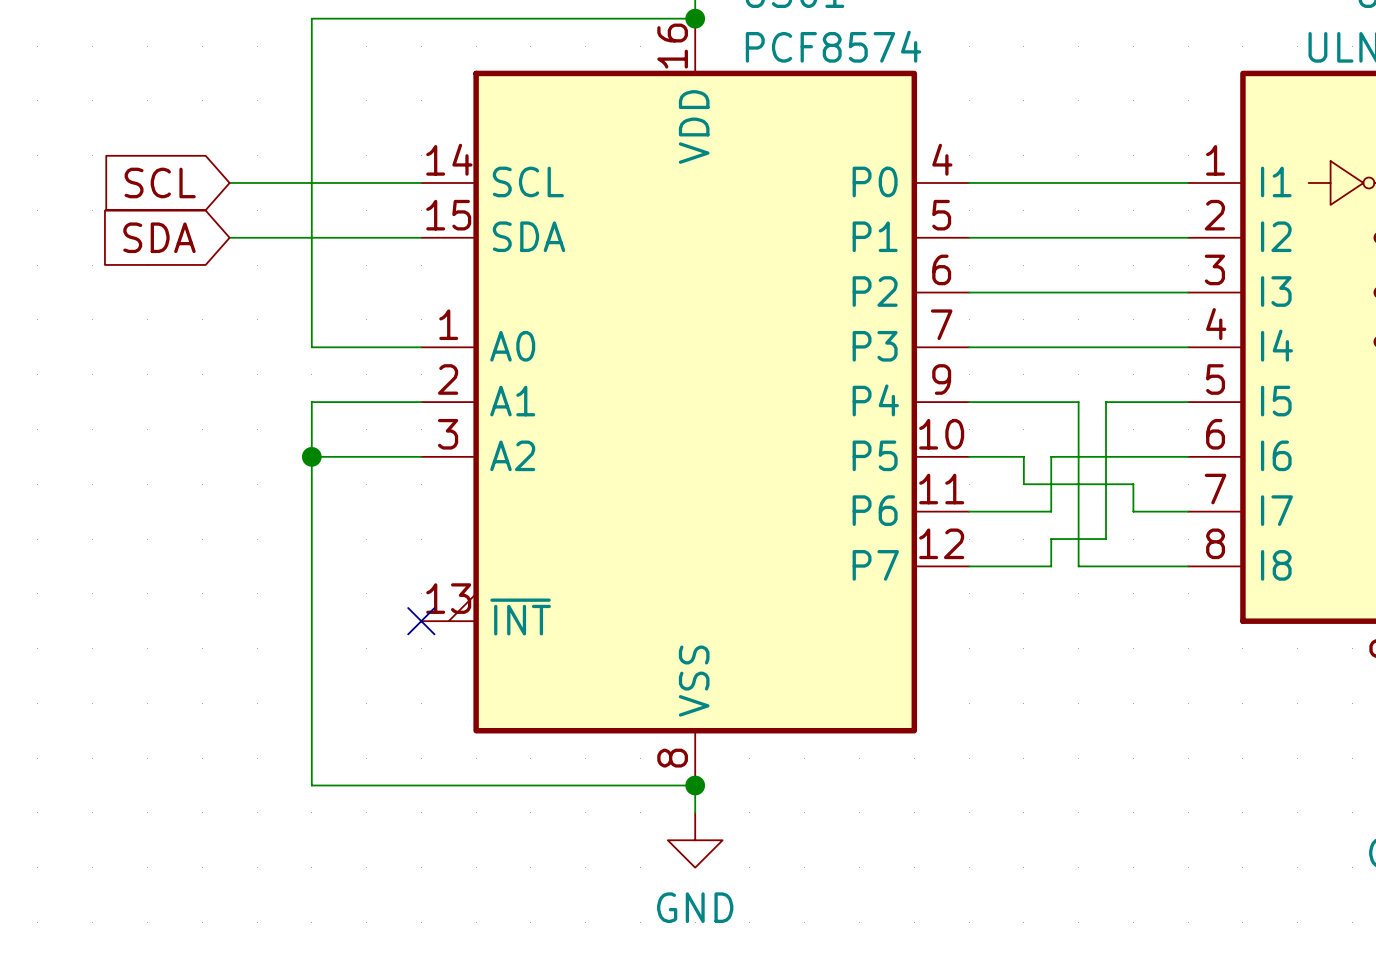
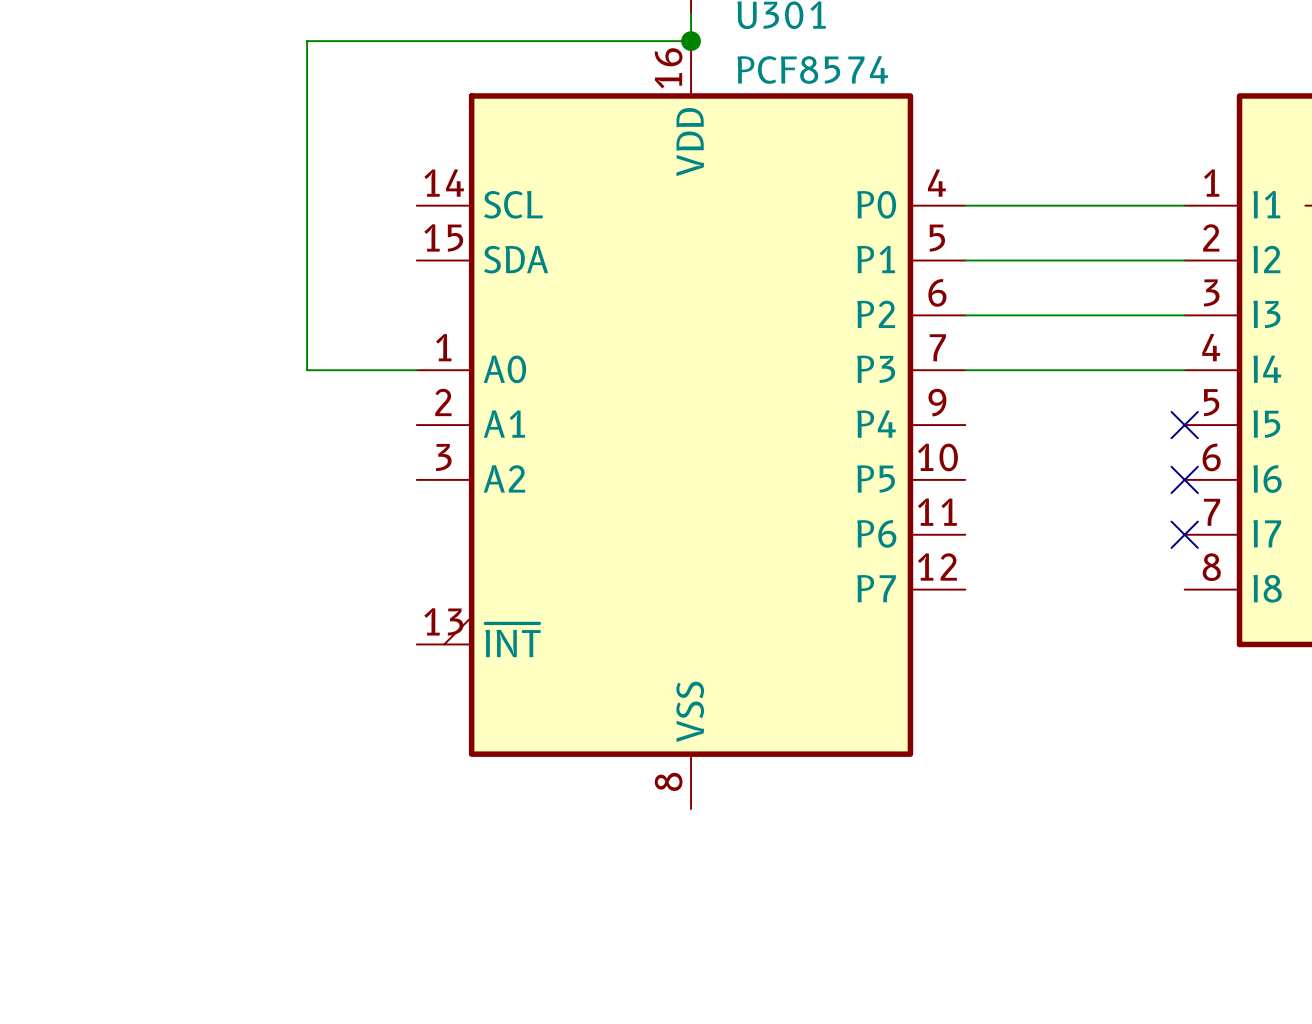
global label: SCL (160, 182) -> none
wire: (229, 182) (421, 182) -> none
global label: SDA (159, 237) -> none
wire: (229, 237) (421, 237) -> none
wire: (421, 402) (311, 402) (311, 785) (695, 785) (695, 812) -> none
wire: (969, 402) (1078, 402) (1078, 566) (1188, 566) -> none
wire: (1188, 402) (1106, 402) (1106, 539) (1051, 539) (1051, 566) (969, 566) -> none
no-connect mark: none -> (1184, 425)
wire: (311, 456) (421, 456) -> none
junction: (311, 456) -> none
wire: (969, 456) (1023, 456) (1023, 484) (1133, 484) (1133, 511) (1188, 511) -> none
wire: (1188, 456) (1051, 456) (1051, 511) (969, 511) -> none
no-connect mark: none -> (1184, 479)
no-connect mark: none -> (1184, 534)
no-connect mark: (421, 621) -> none
junction: (695, 785) -> none
power symbol: GND (695, 840) -> none

